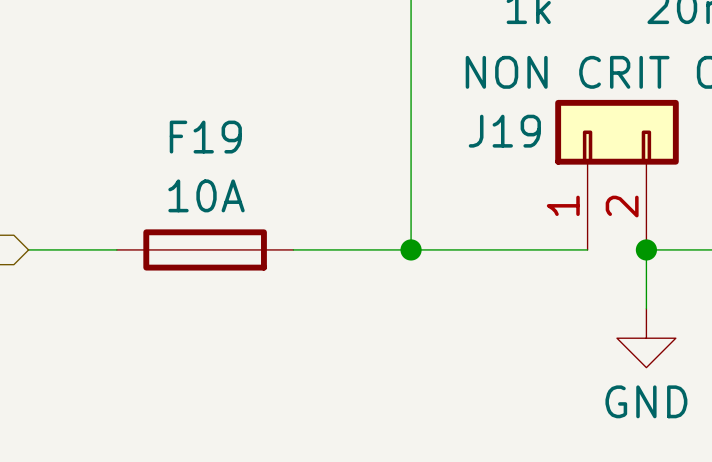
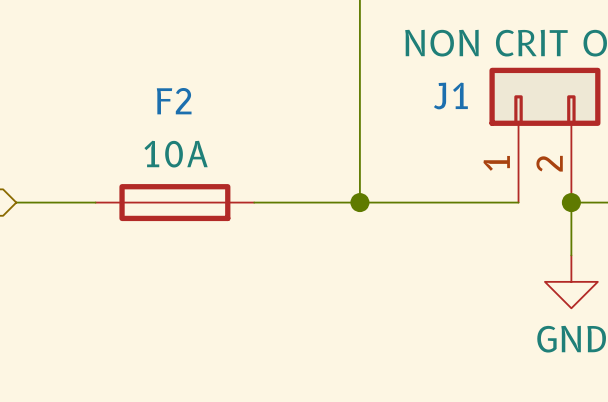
J19 name: J19 (504, 131) -> J1 (450, 96)
F19 name: F19 (205, 137) -> F2 (174, 101)

